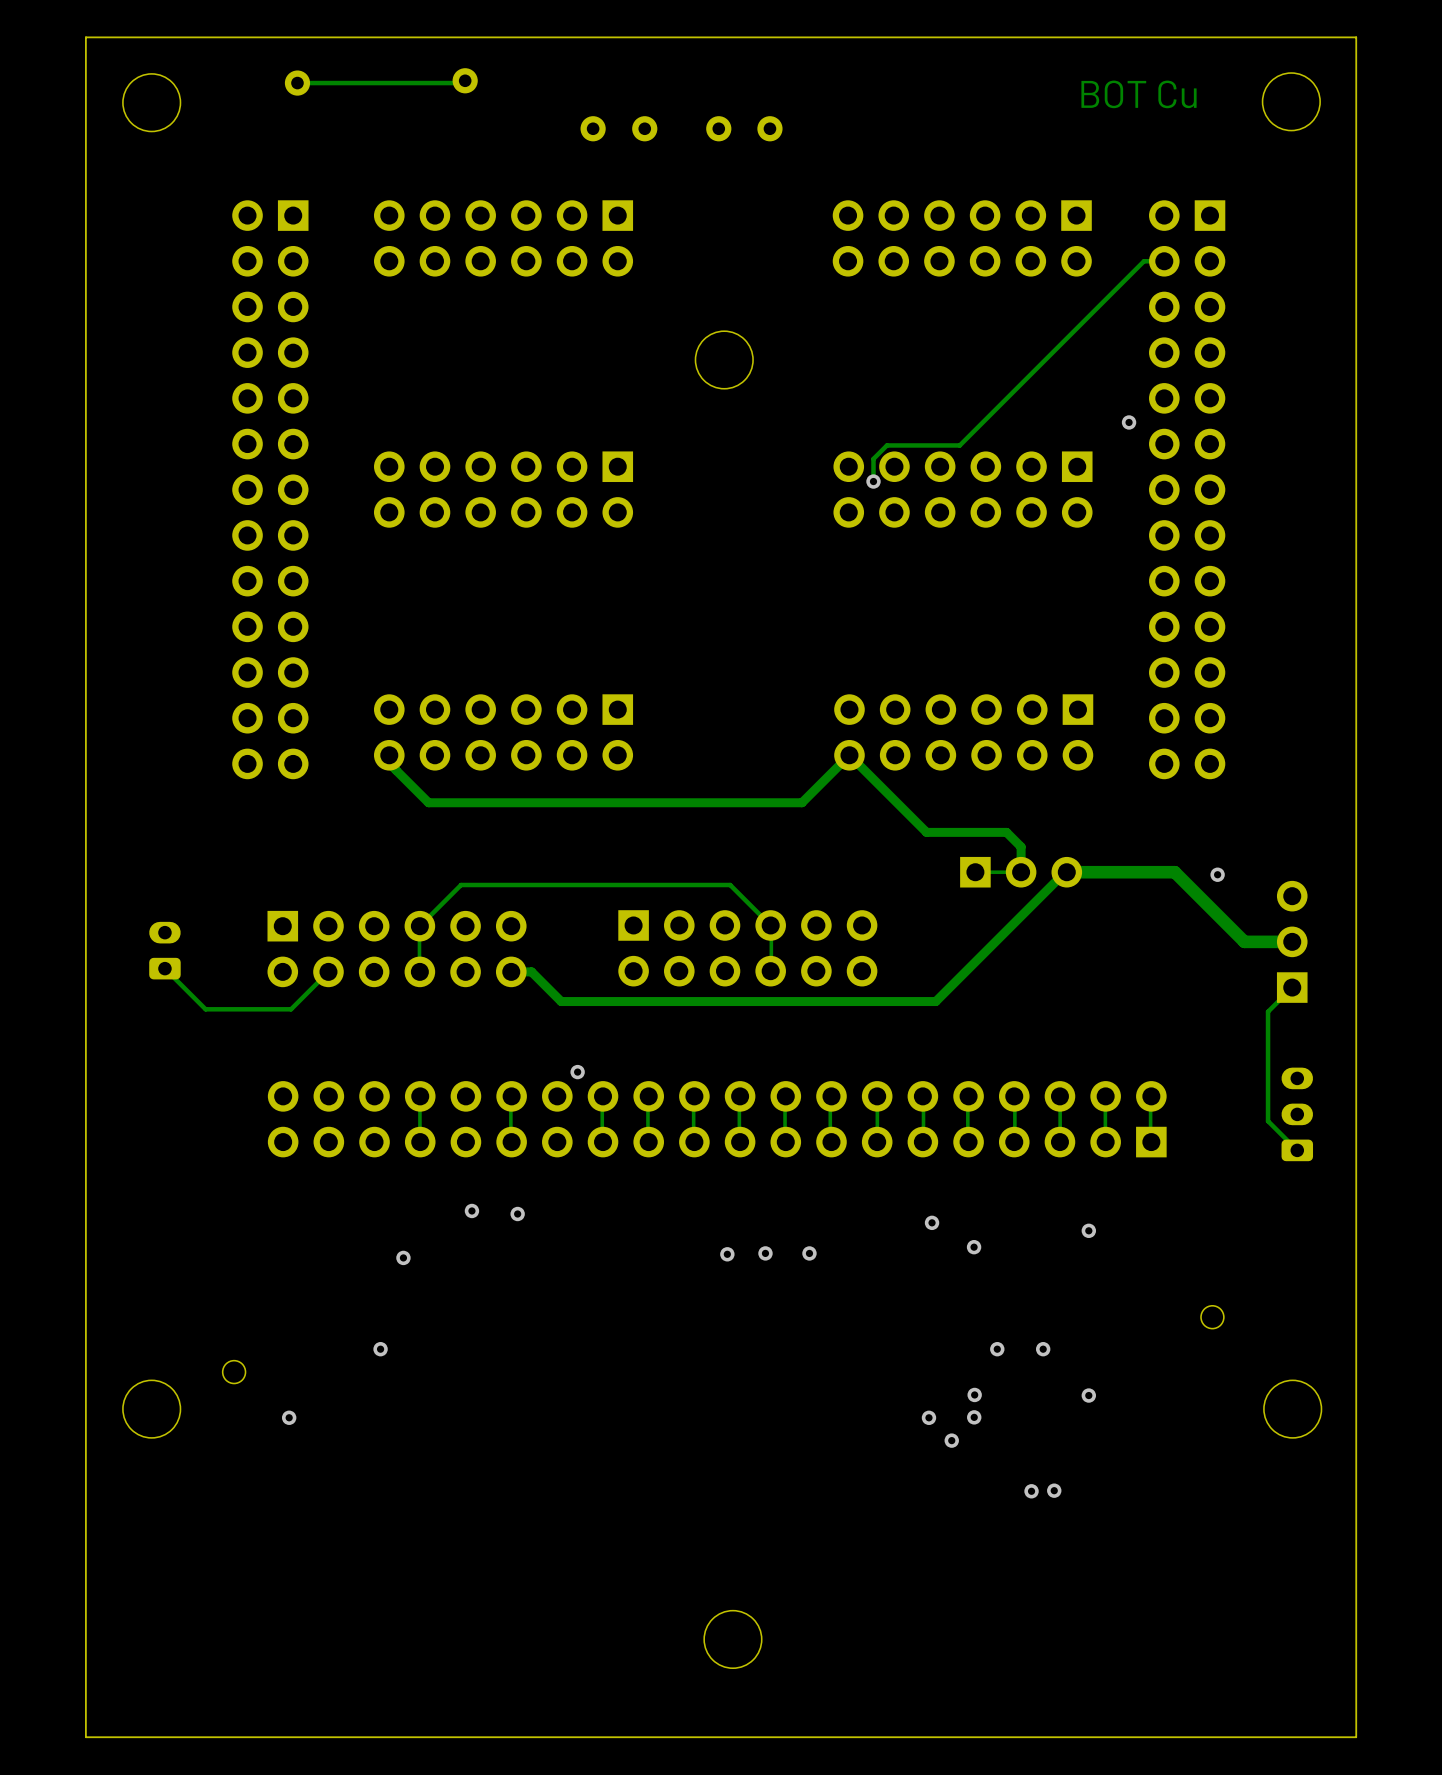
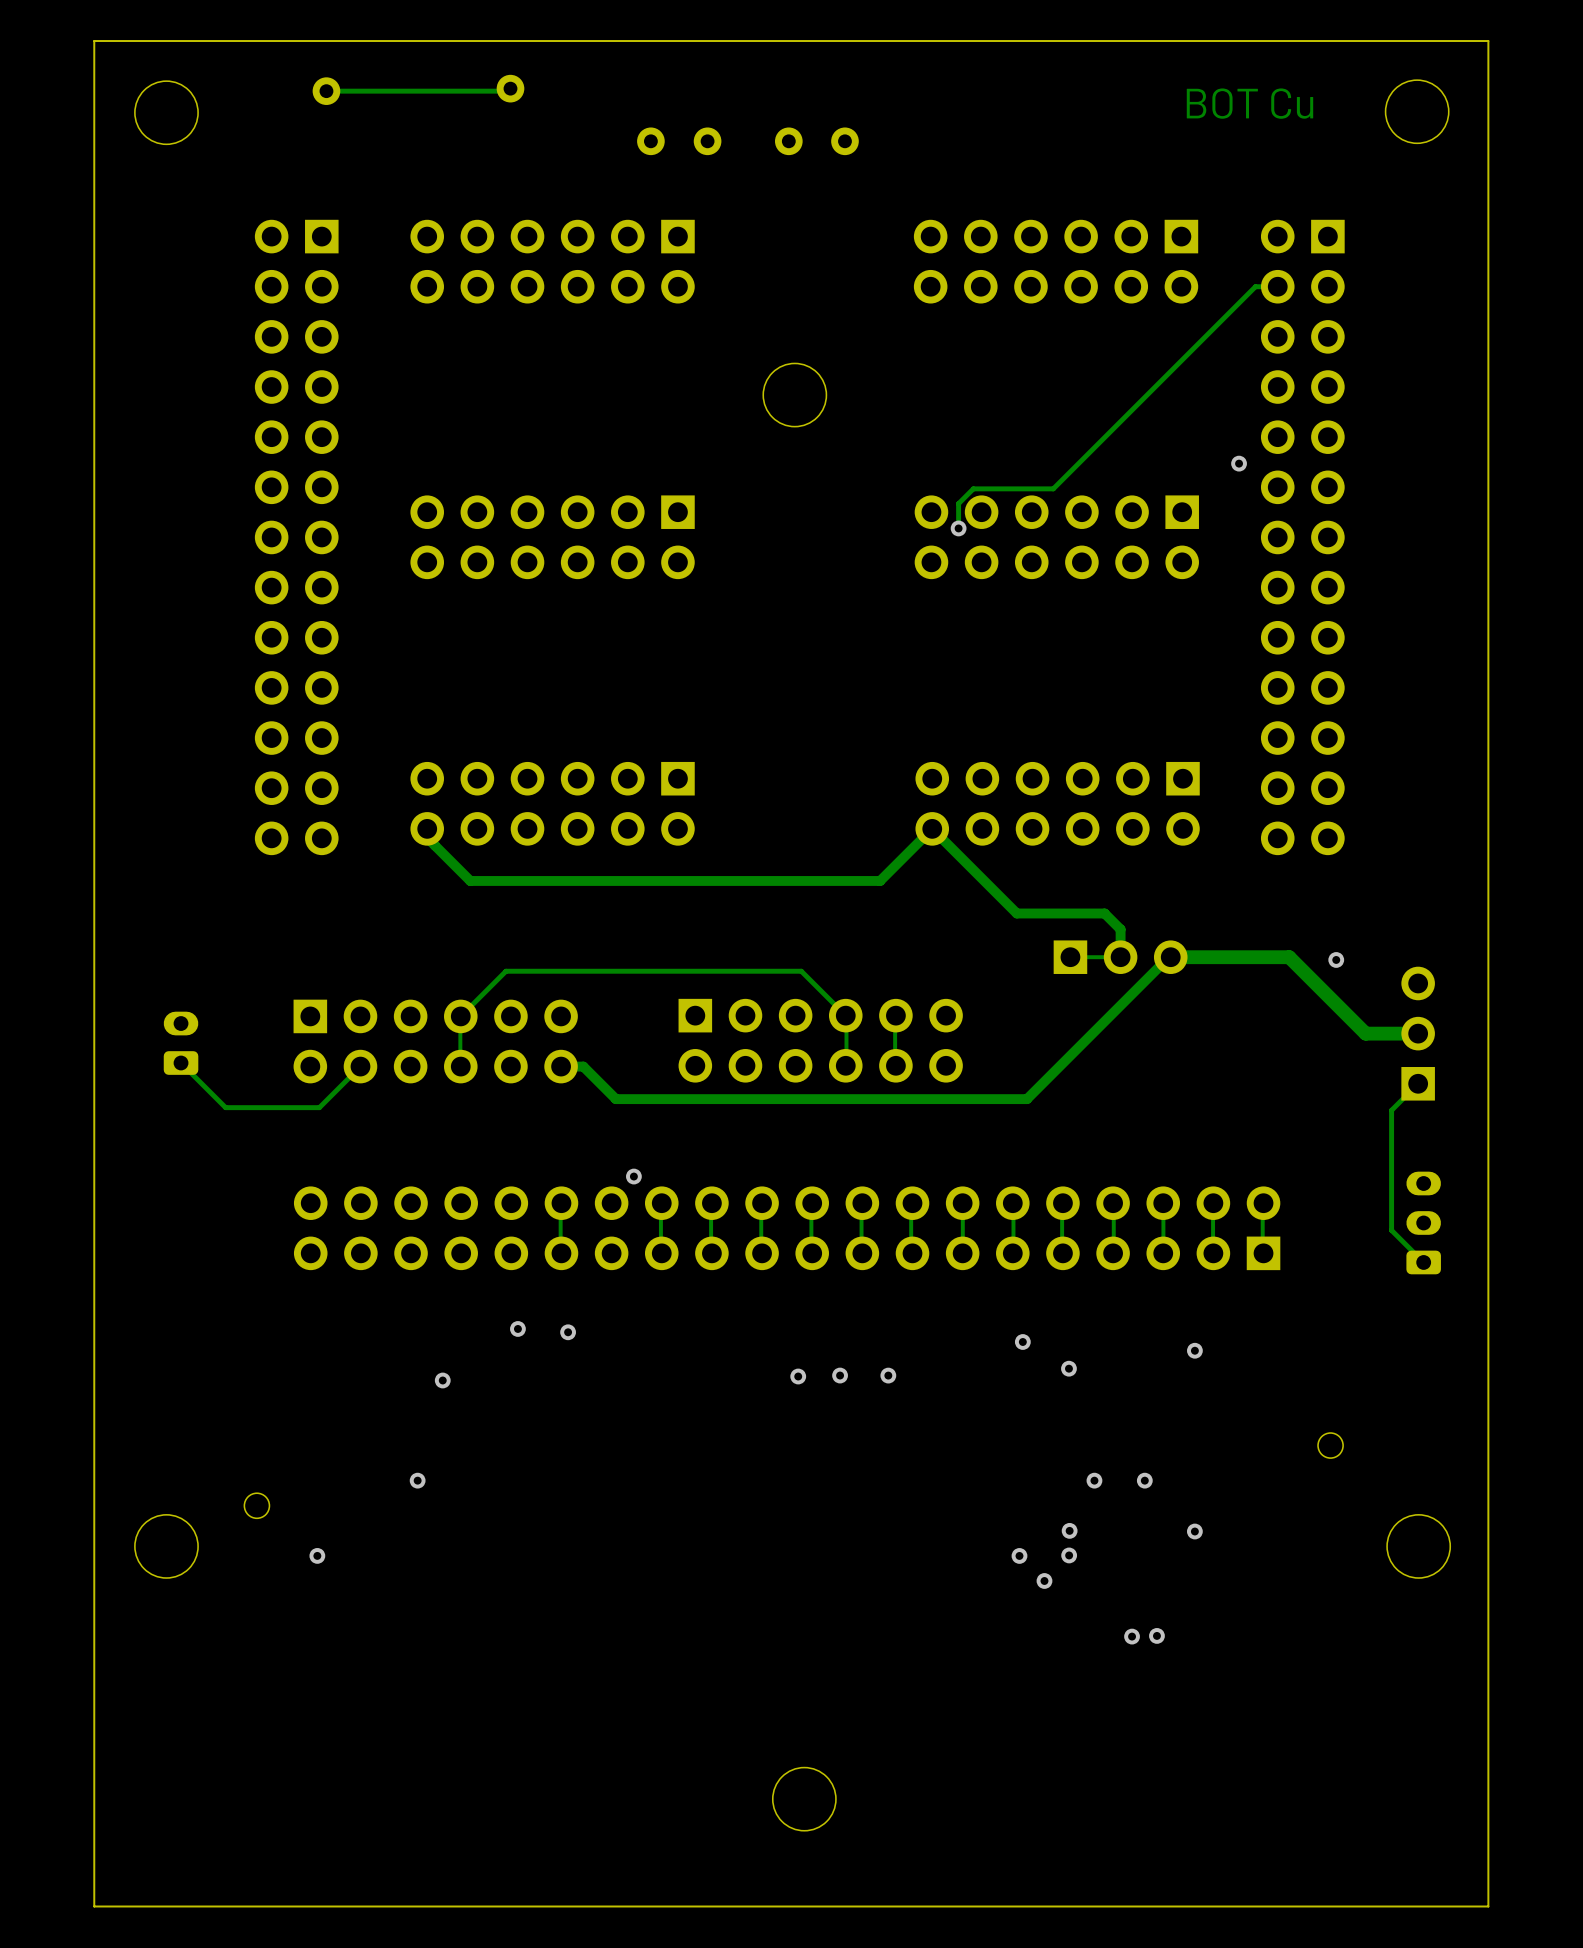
track: (419, 1107) (419, 1130) -> (895, 1026) (895, 1051)

